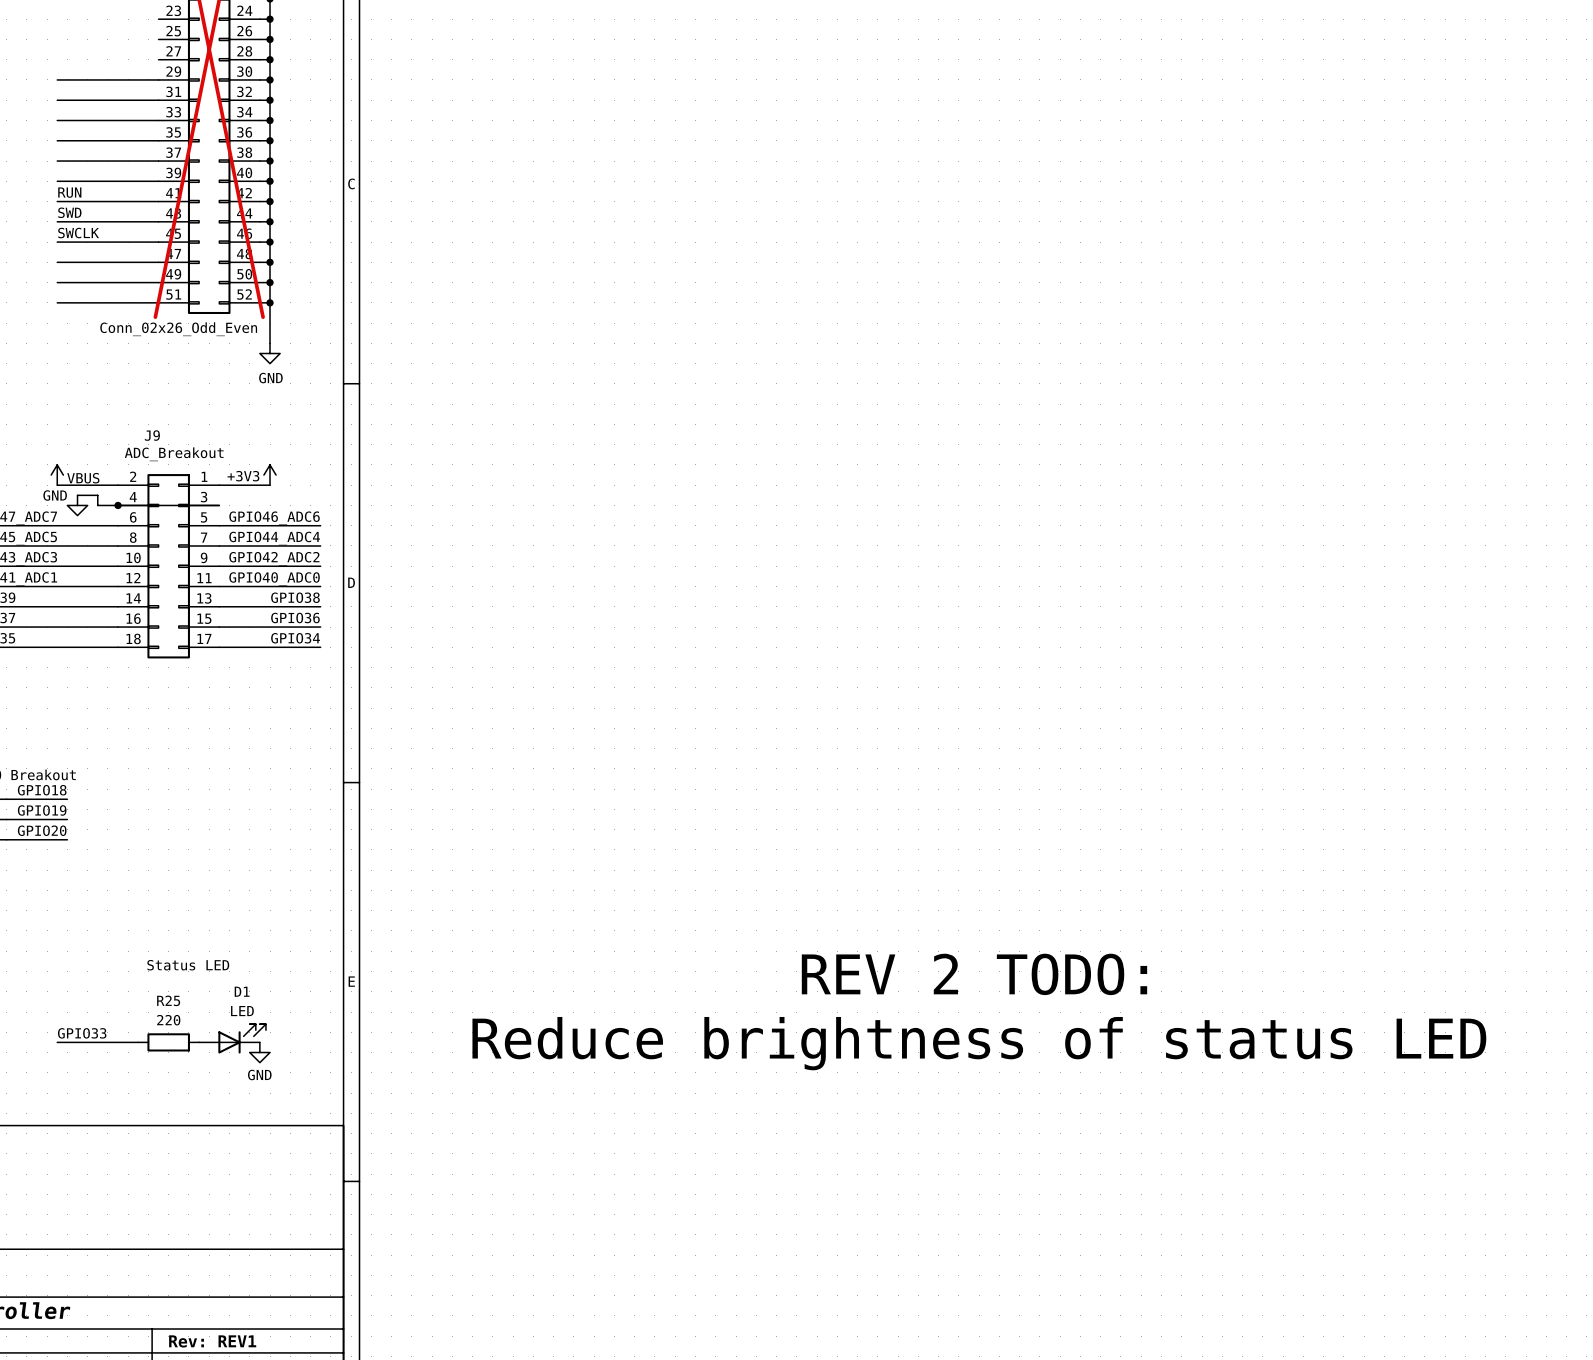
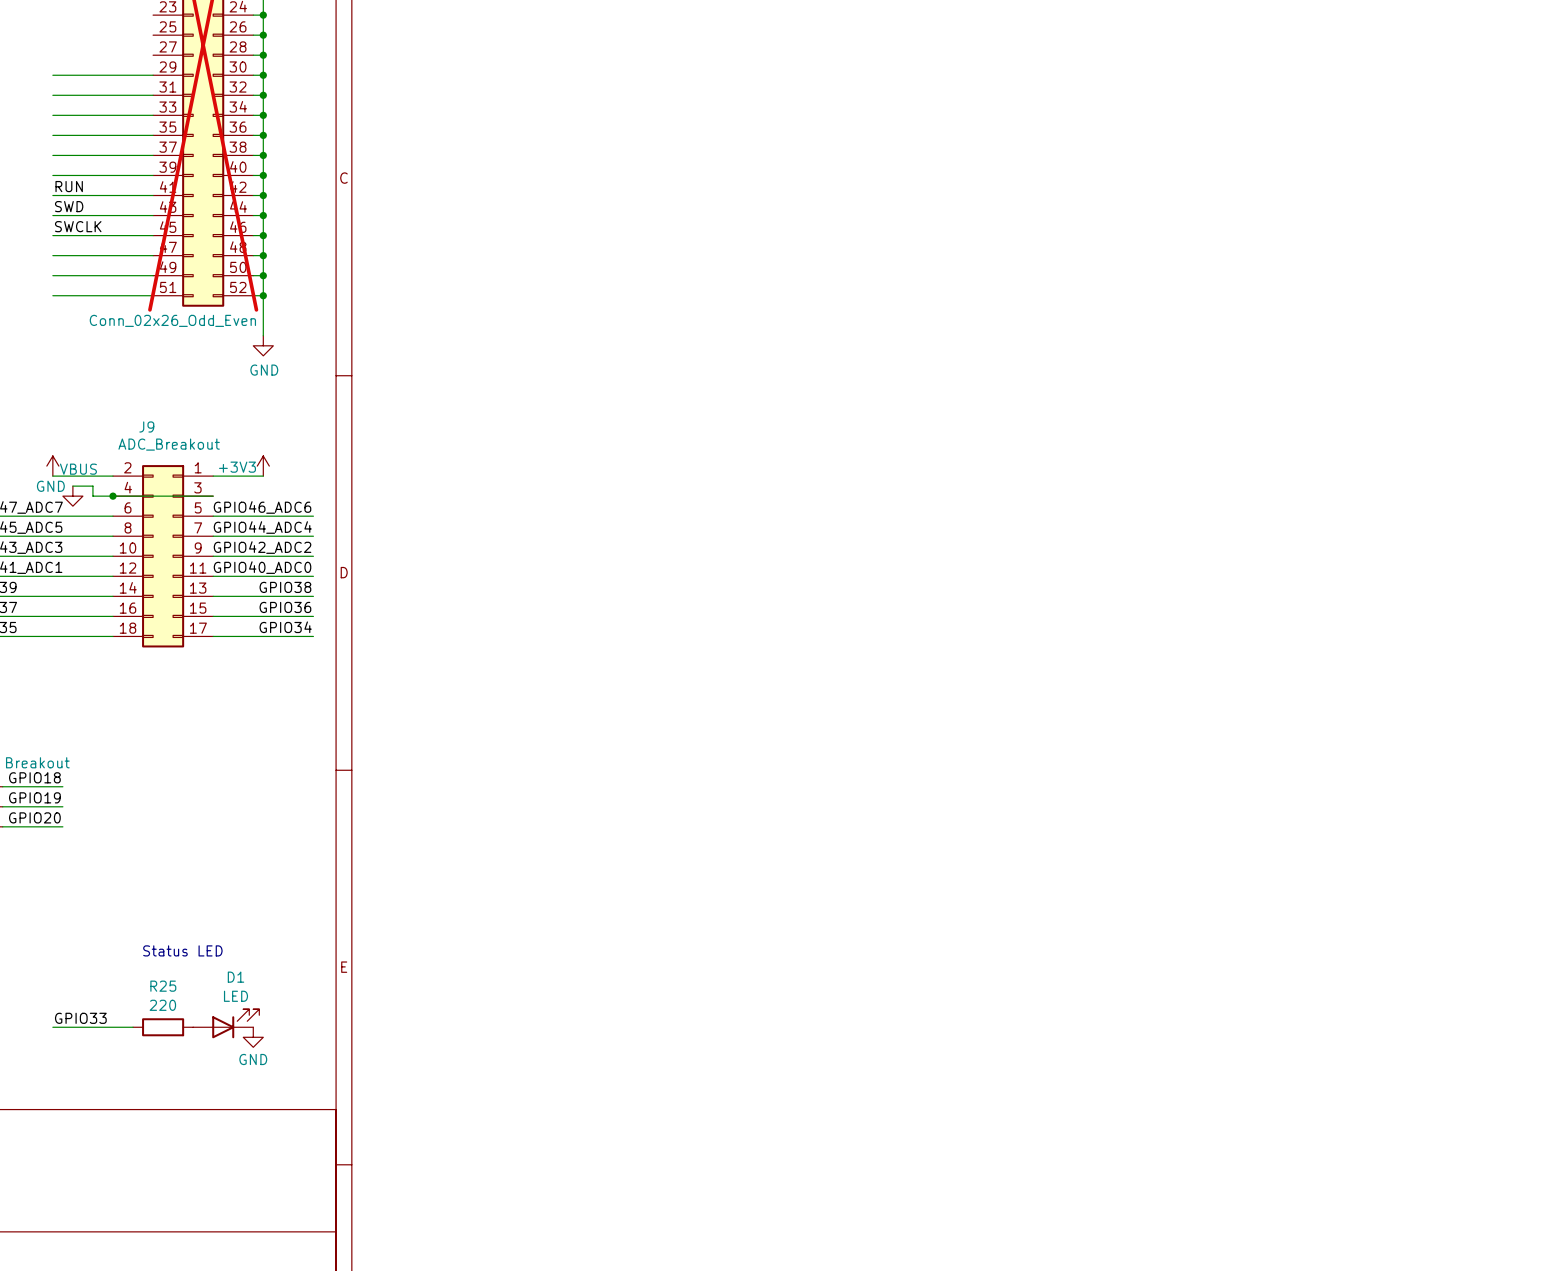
text: REV 2 TODO: (974, 974) -> none
text: Reduce brightness of status LED (979, 1043) -> none

